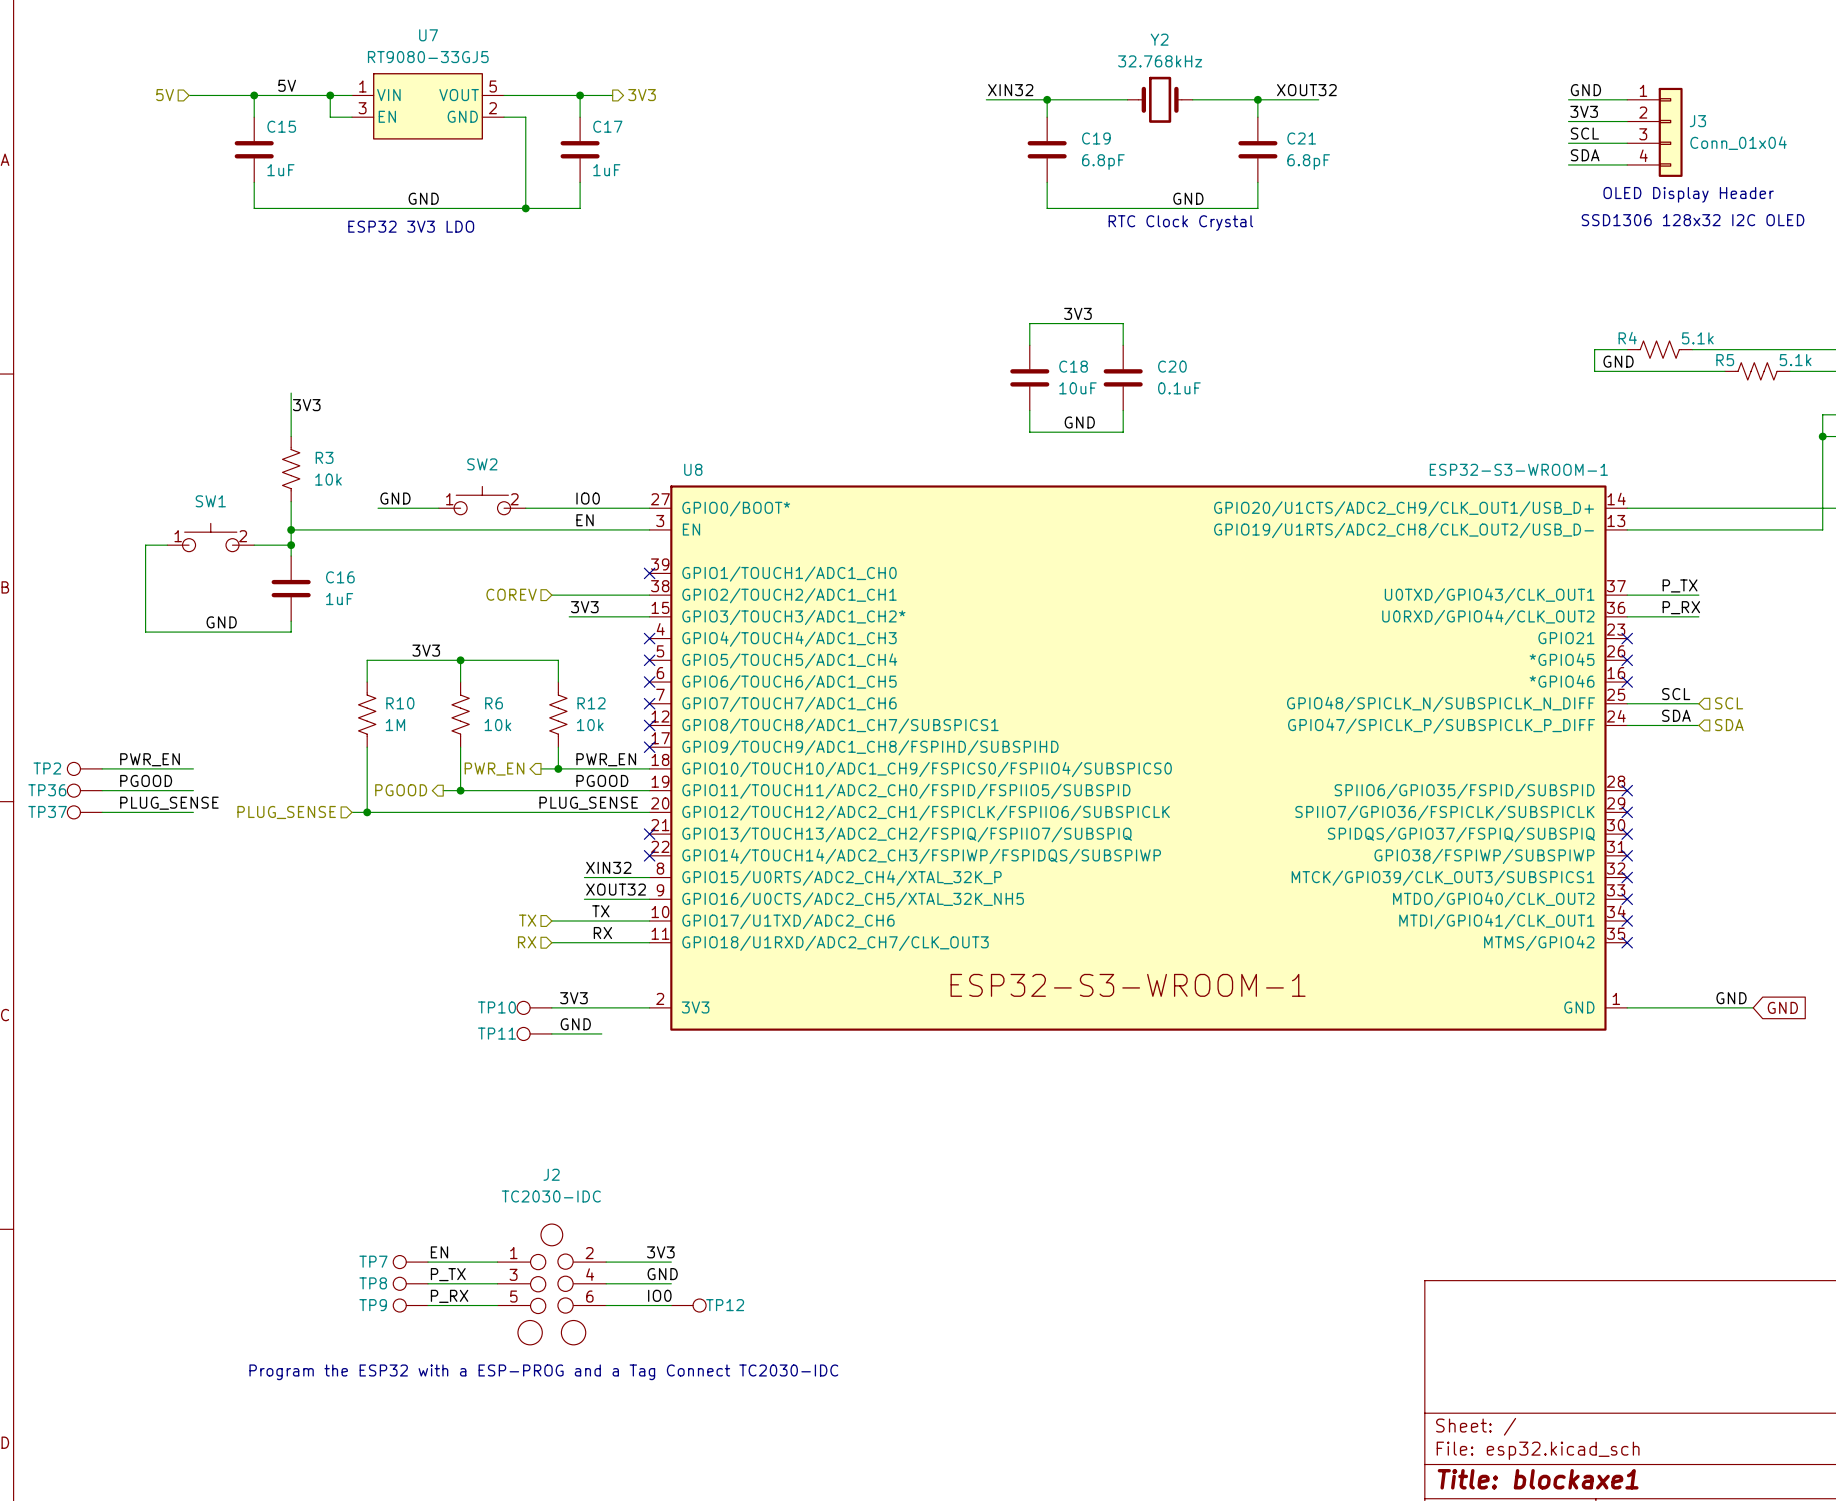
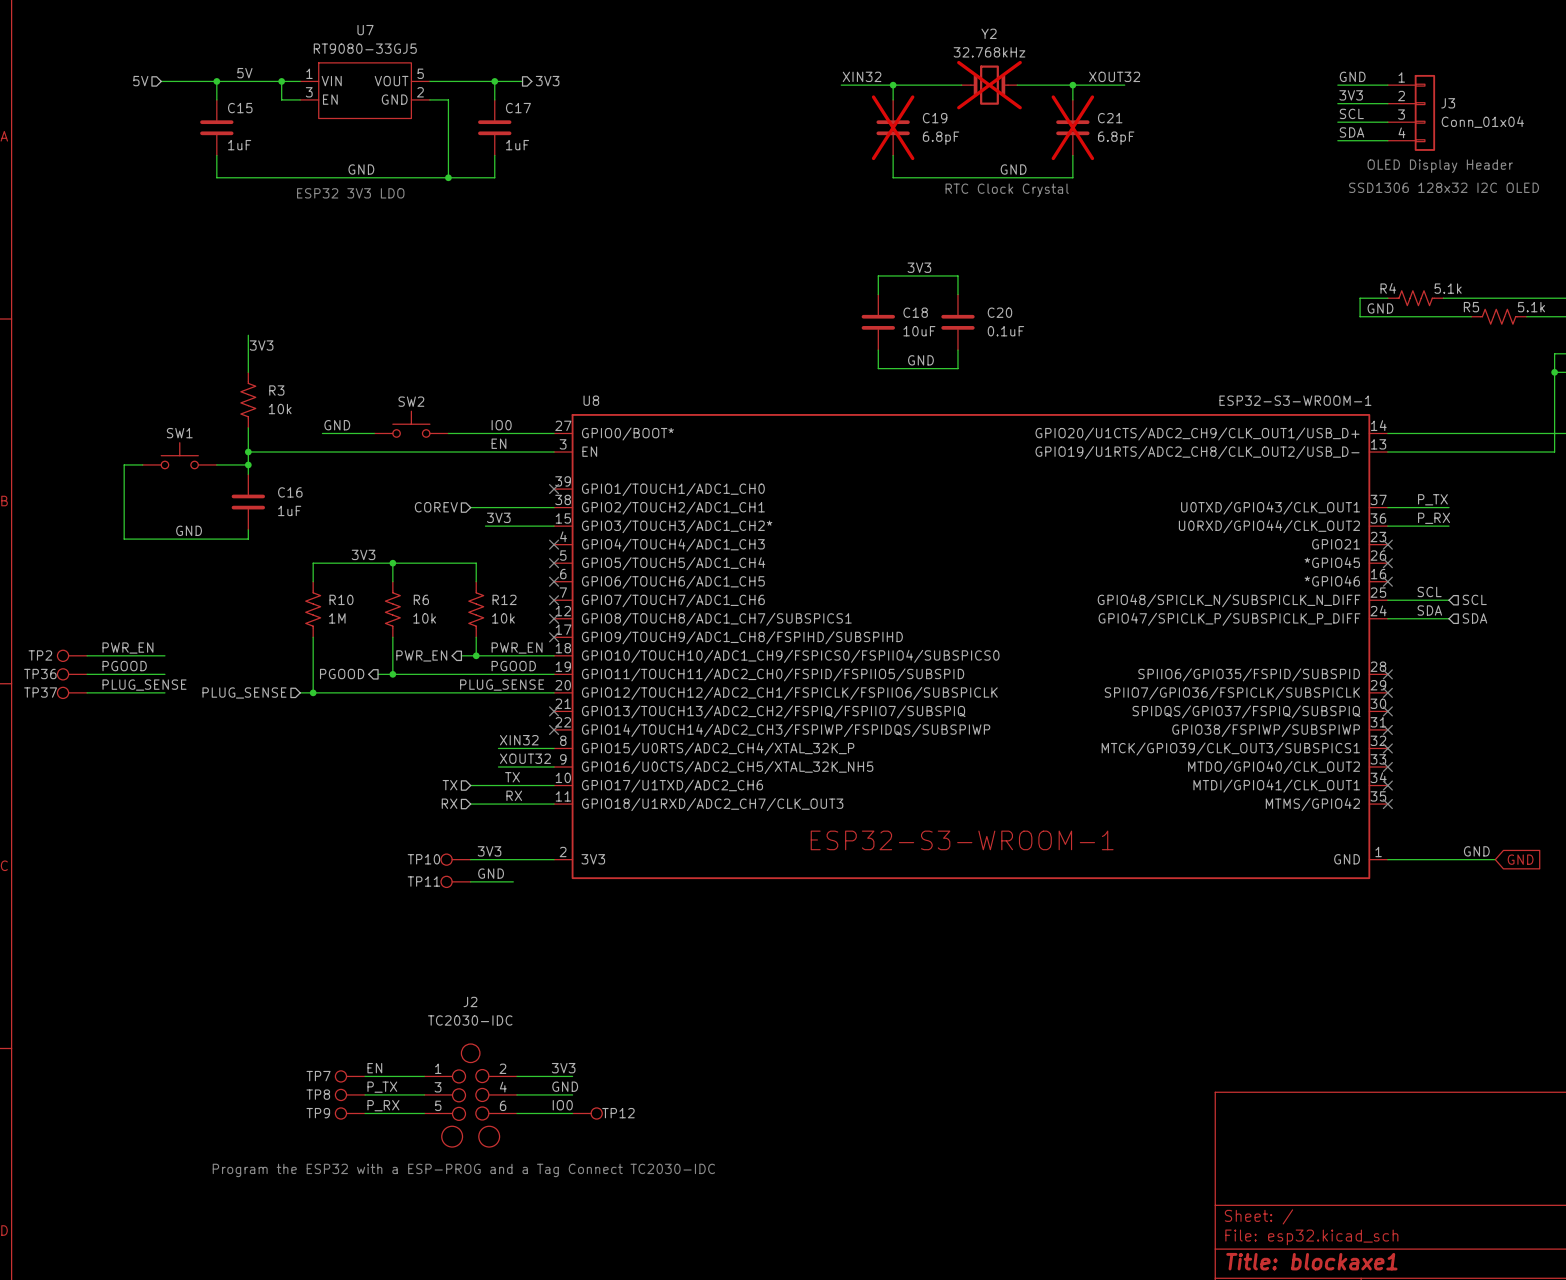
Y2 do-not-place cross: none -> (989, 85)
C19 do-not-place cross: none -> (893, 127)
C21 do-not-place cross: none -> (1072, 127)
SW2 symbol: [438, 486, 526, 515] -> [374, 411, 449, 438]
SW1 symbol: [167, 523, 255, 552] -> [142, 442, 217, 469]

